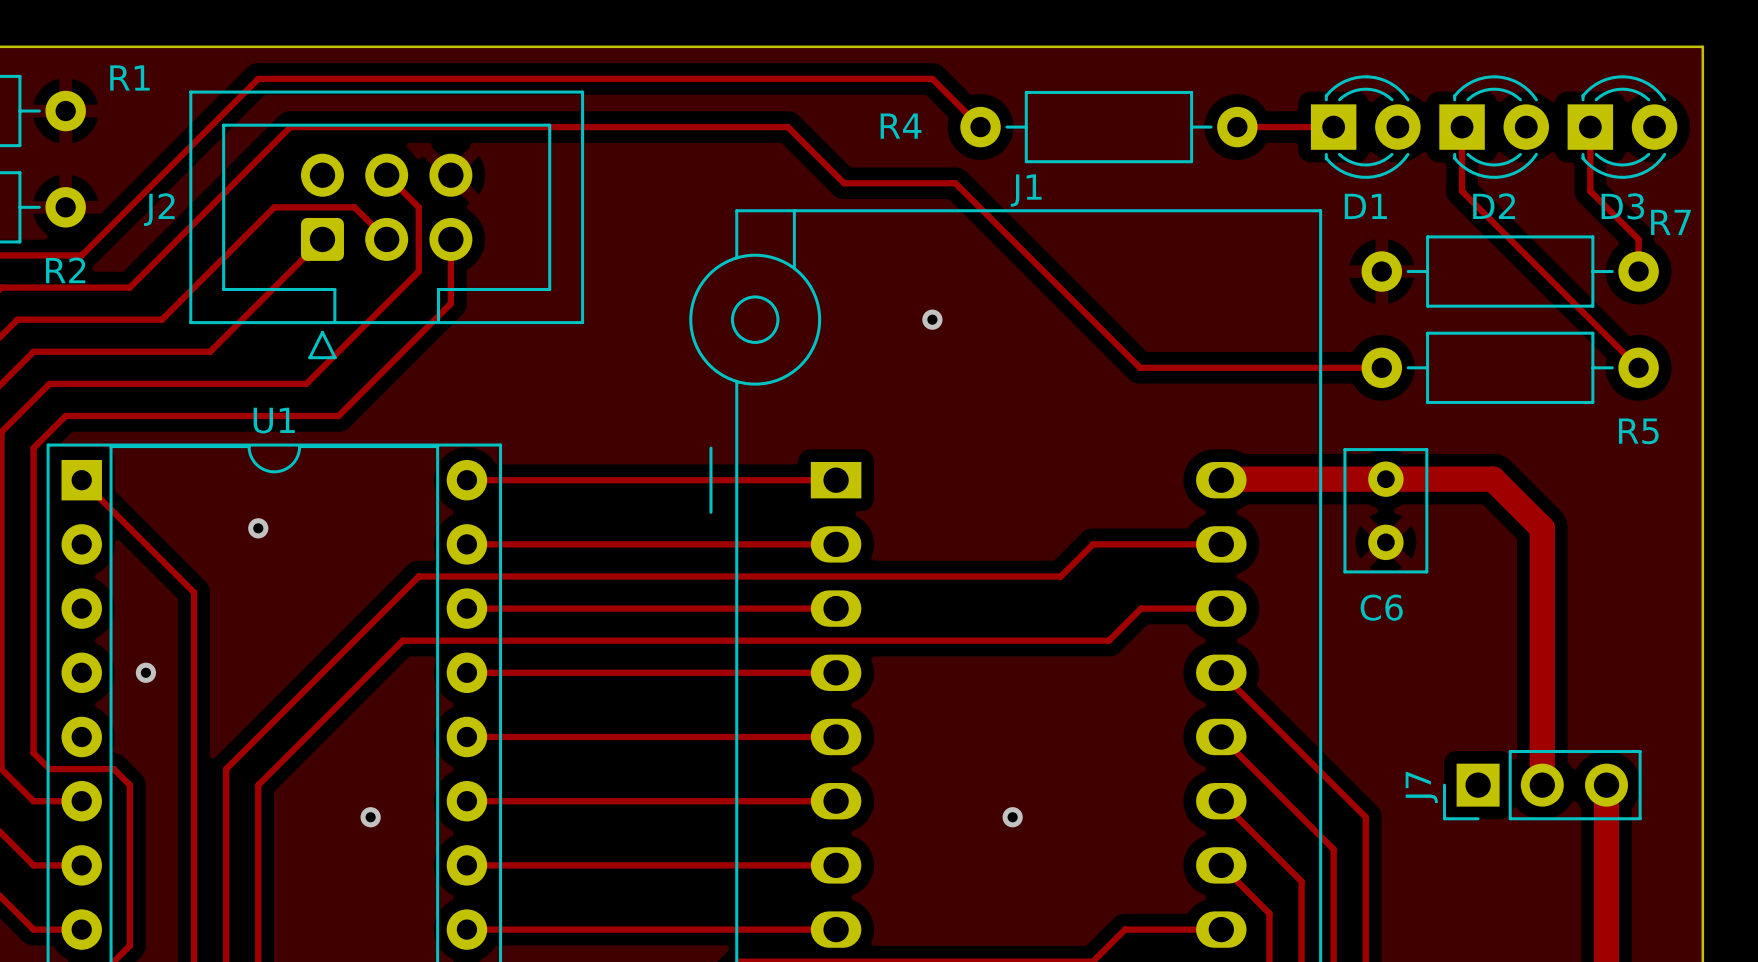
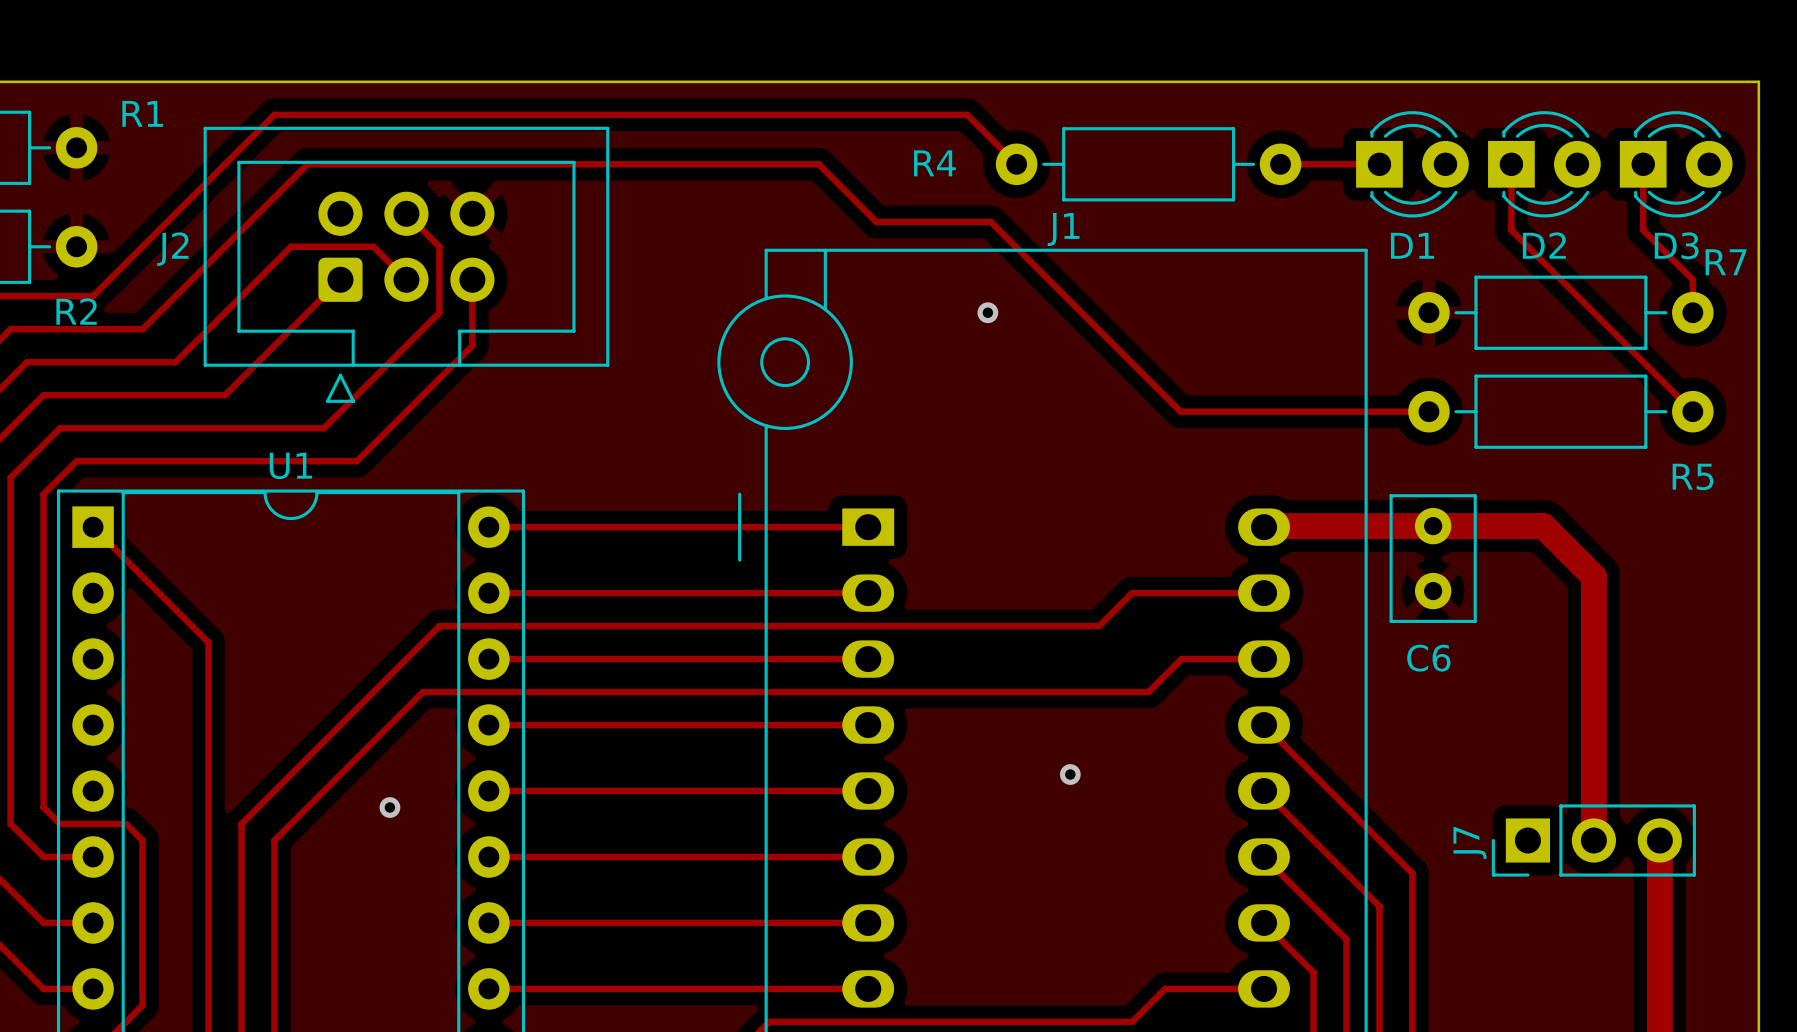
via position: (932, 319) -> (987, 312)
via: (258, 528) -> none
via: (145, 672) -> none
via position: (370, 817) -> (389, 807)
via position: (1012, 817) -> (1070, 774)

